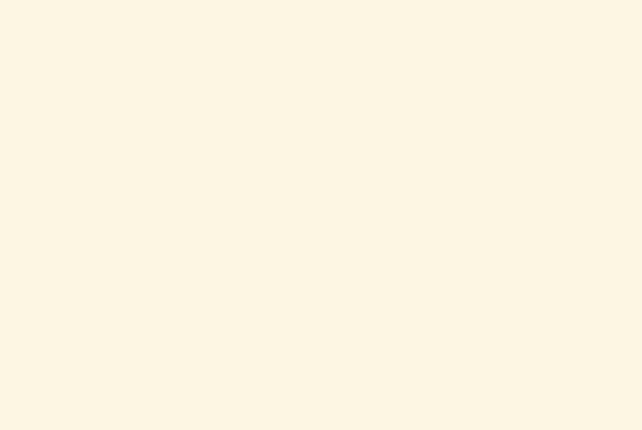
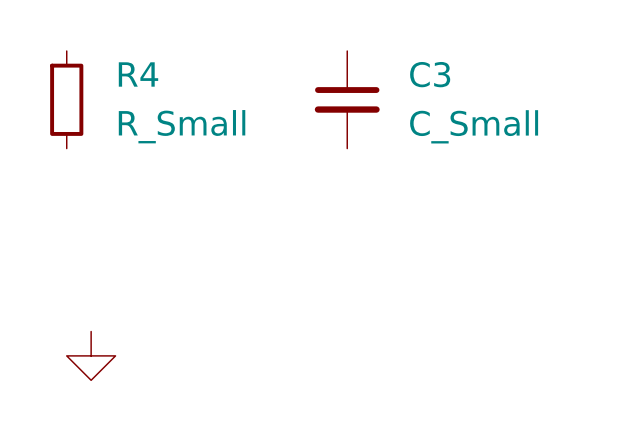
R4: none -> R_Small (66, 99)
C3: none -> C_Small (347, 99)
power symbol: none -> (91, 355)

